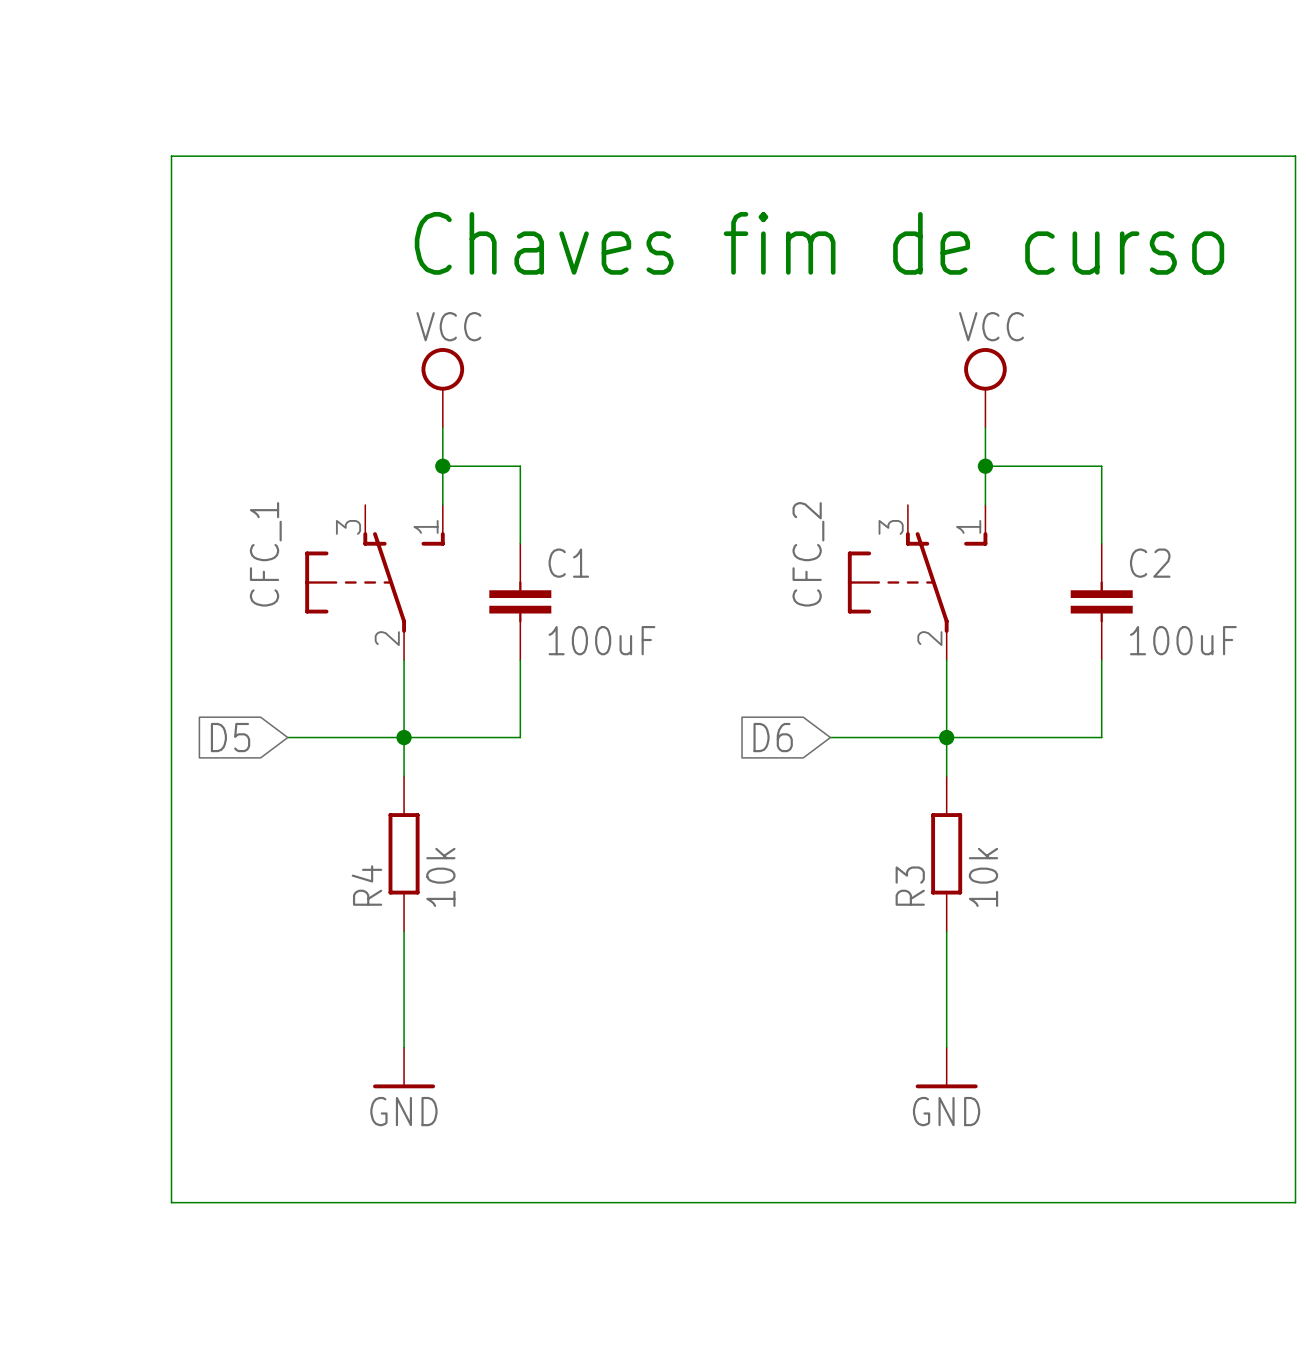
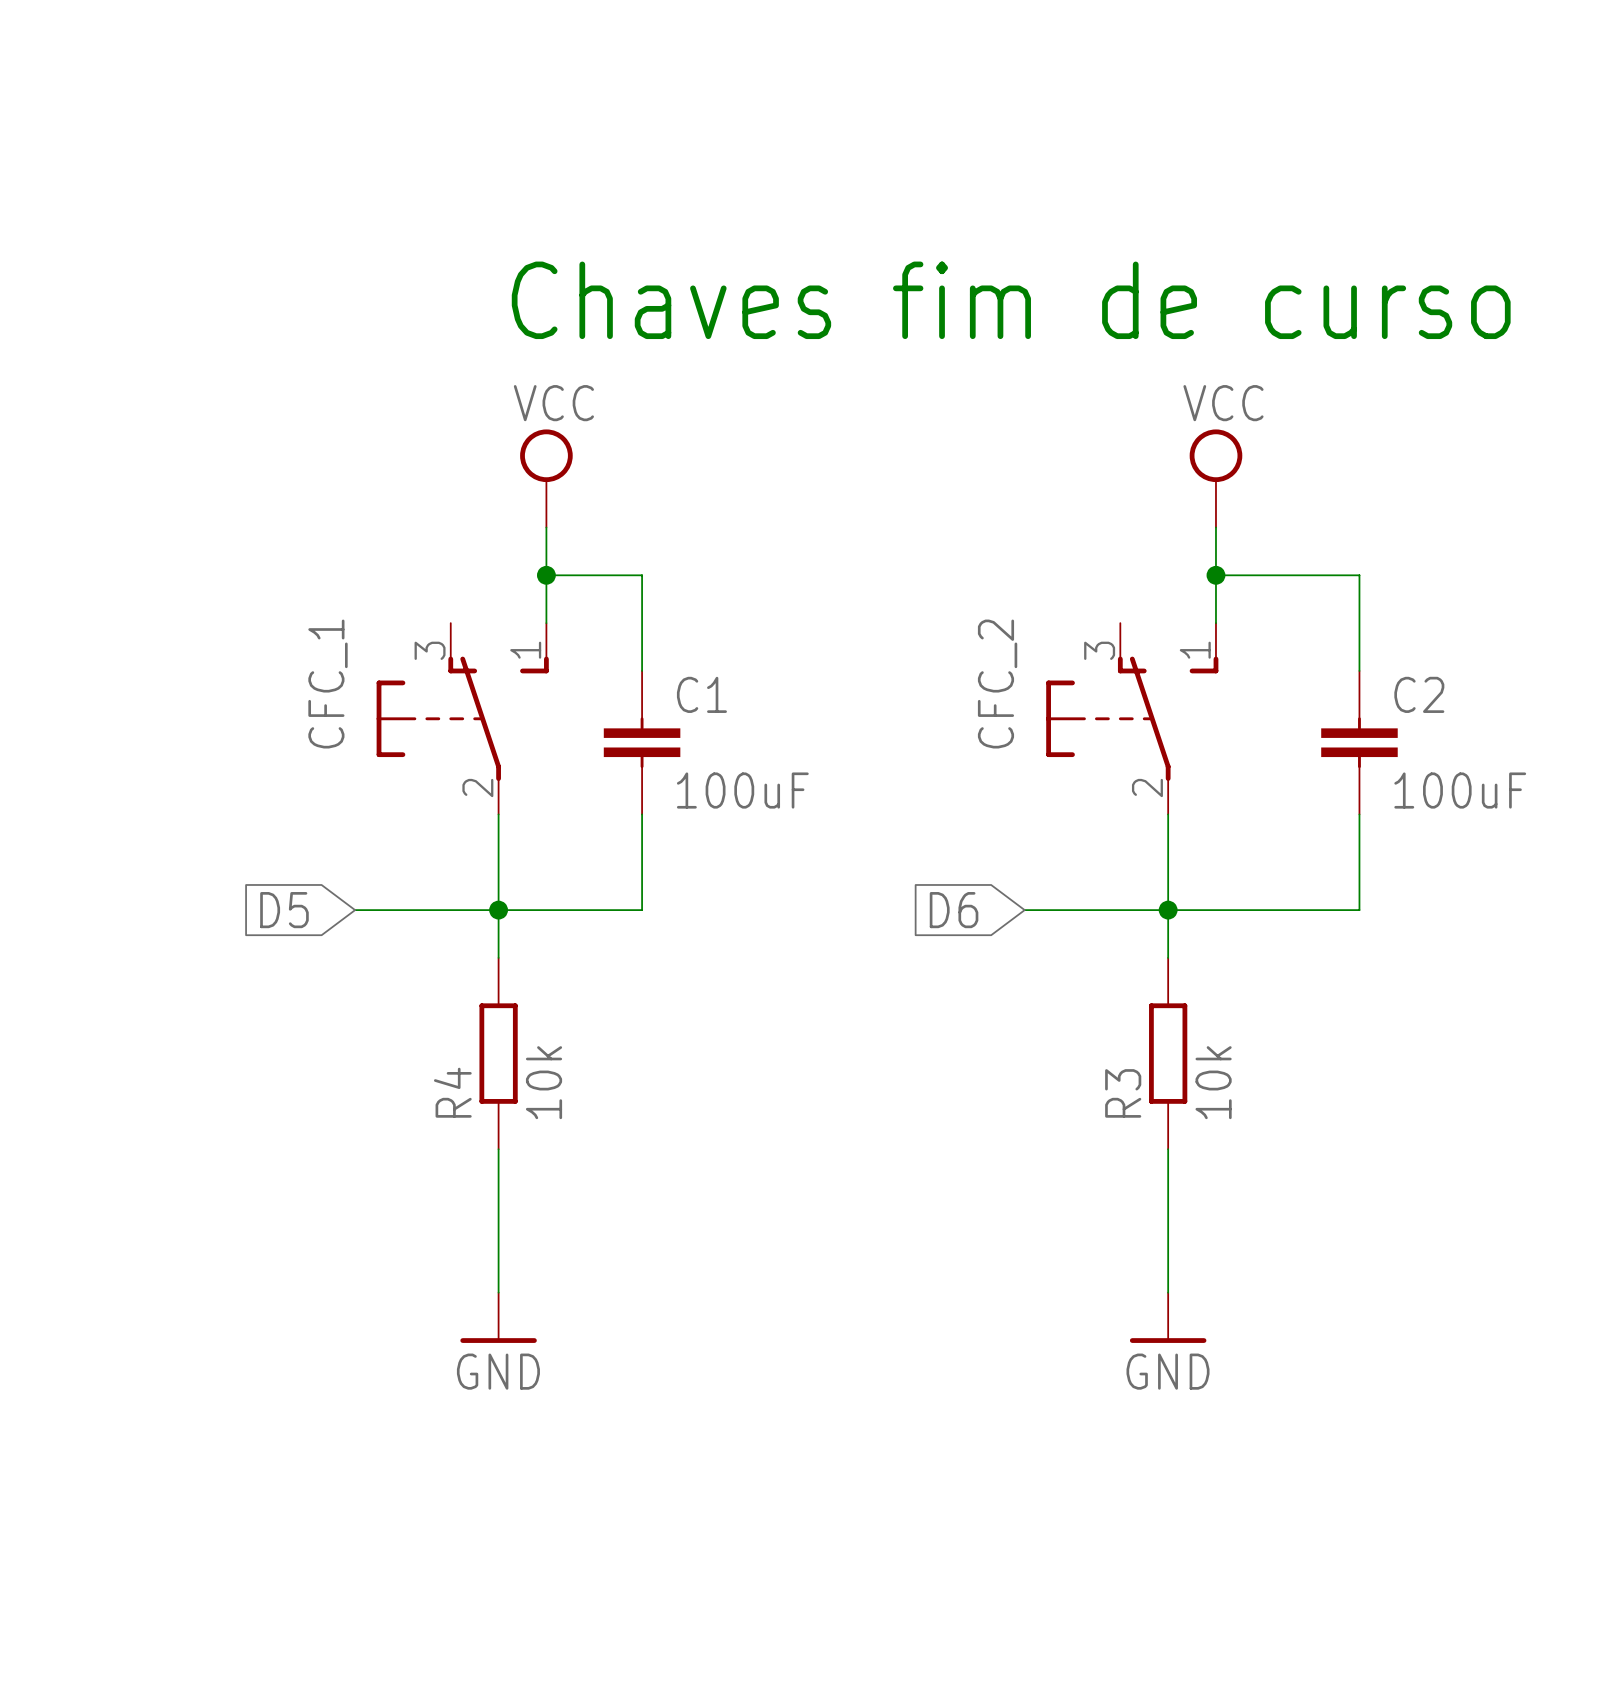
wire: (171, 156) (171, 1202) (1295, 1202) (1295, 156) (171, 156) -> none

